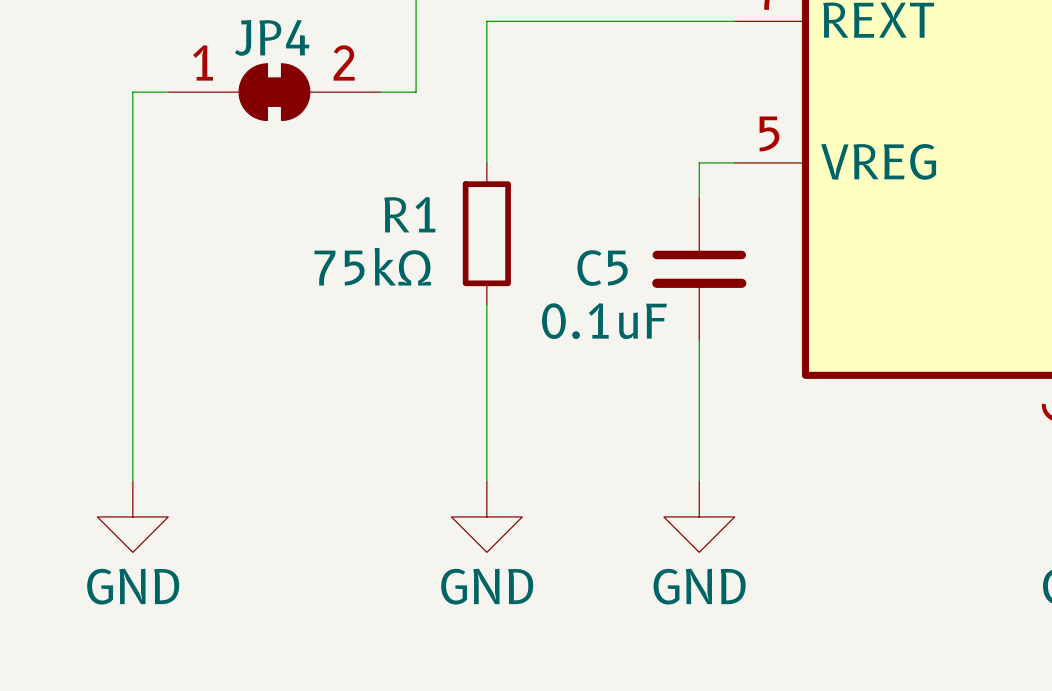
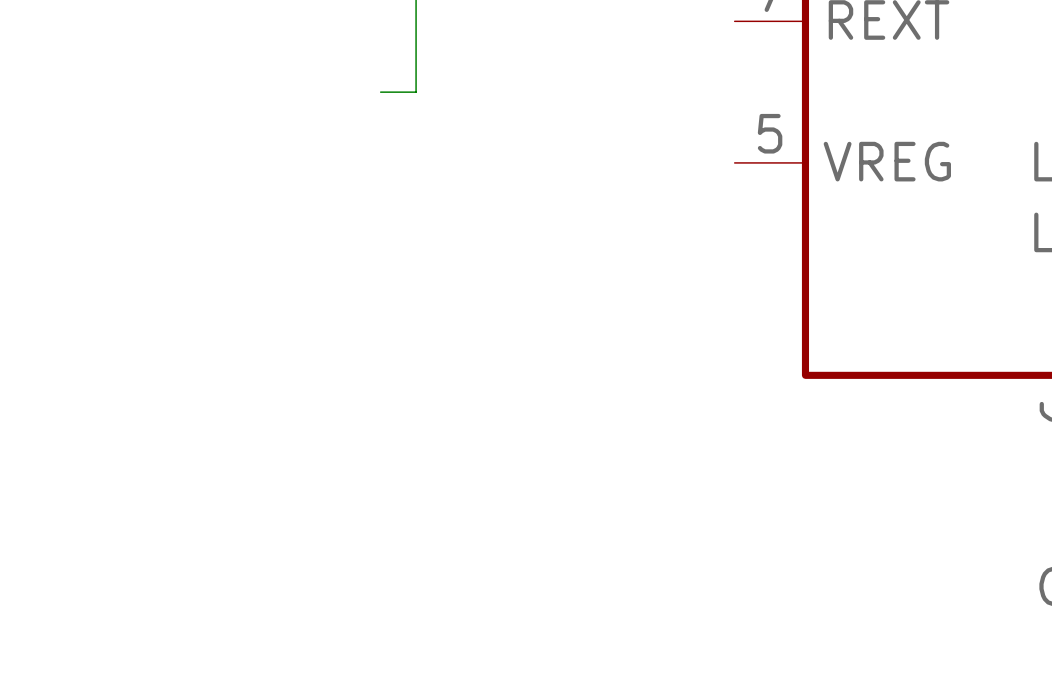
wire: (734, 21) (486, 21) (486, 162) -> none
wire: (168, 92) (132, 92) (132, 481) -> none
JP4: (274, 92) -> none
wire: (734, 162) (699, 162) (699, 198) -> none
R1: 75kΩ (486, 233) -> none
C5: 0.1uF (699, 269) -> none
wire: (486, 304) (486, 481) -> none
wire: (699, 339) (699, 481) -> none
power symbol: GND (132, 516) -> none
power symbol: GND (486, 516) -> none
power symbol: GND (699, 516) -> none

